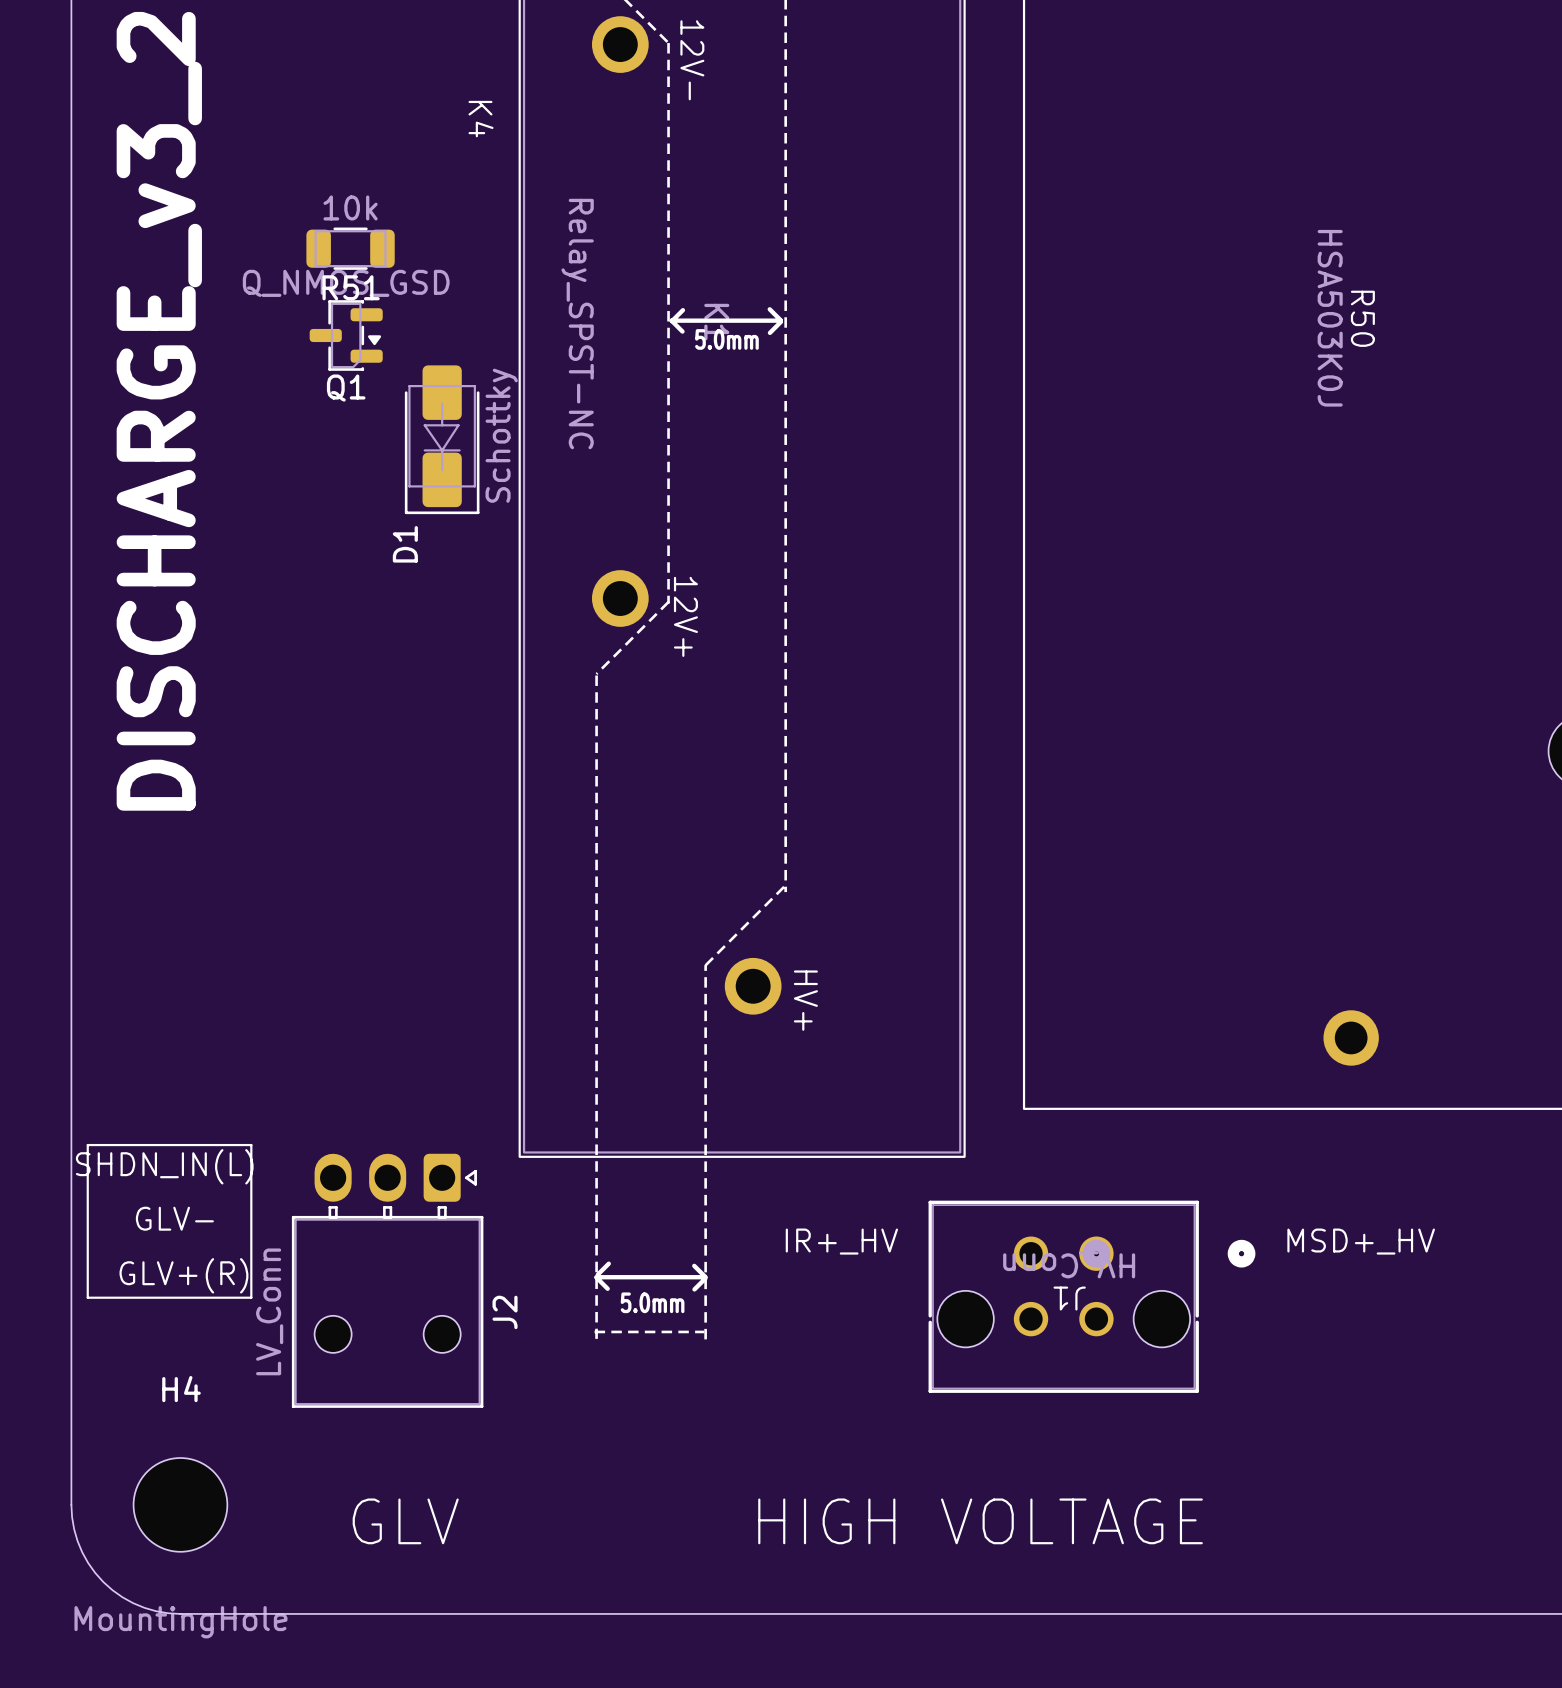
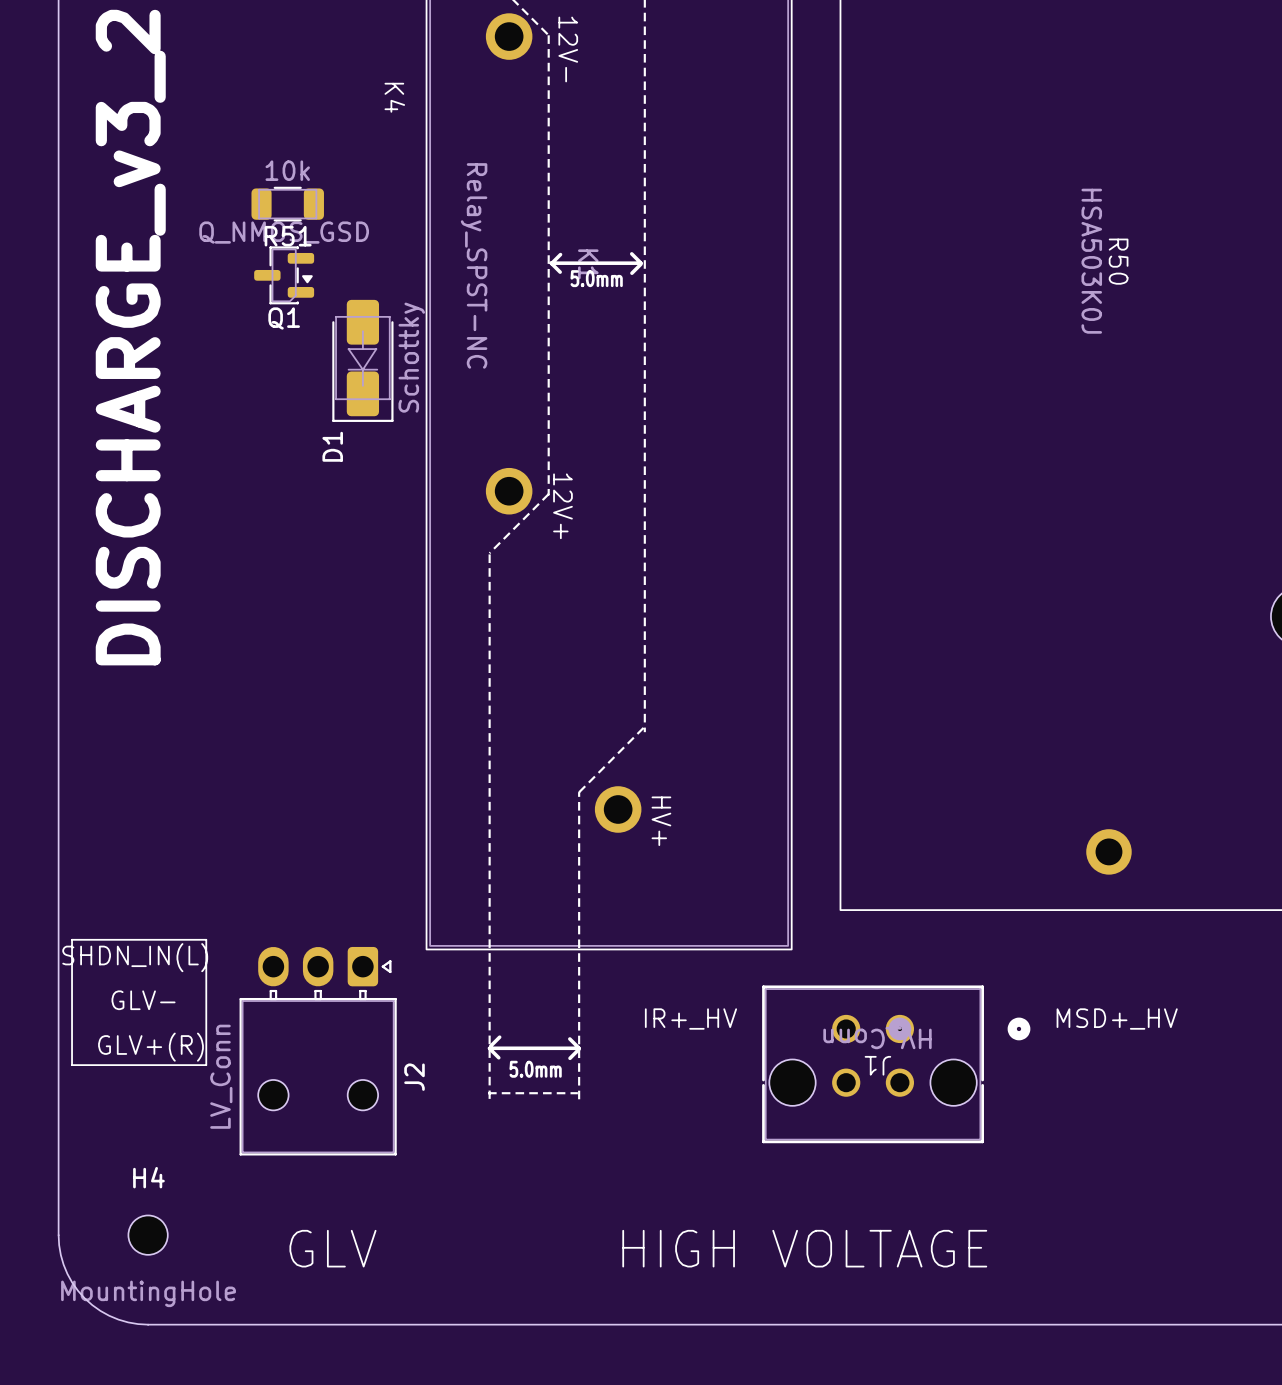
H4 name position: H4 (181, 1389) -> H4 (148, 1177)
H4 footprint: [133, 1458, 228, 1552] -> [128, 1215, 168, 1255]
H4 value position: MountingHole (180, 1622) -> MountingHole (148, 1293)

